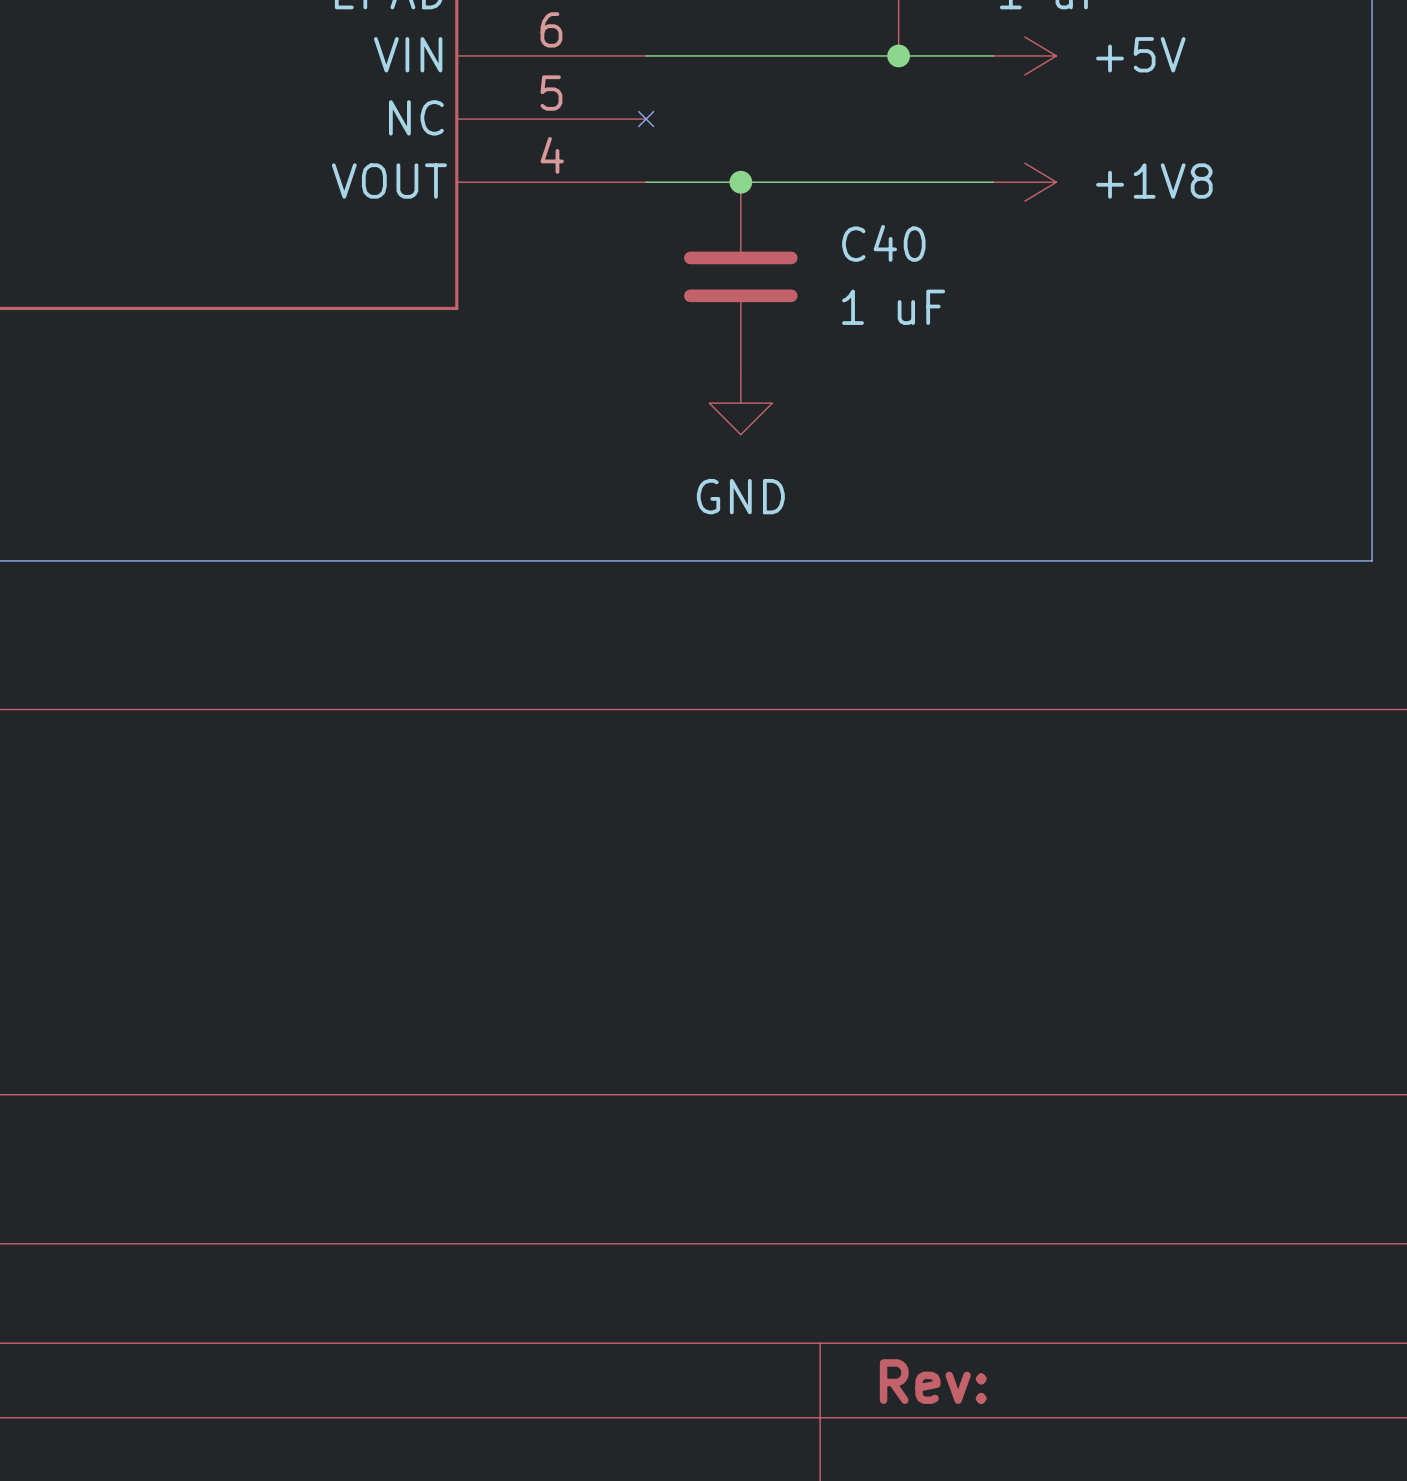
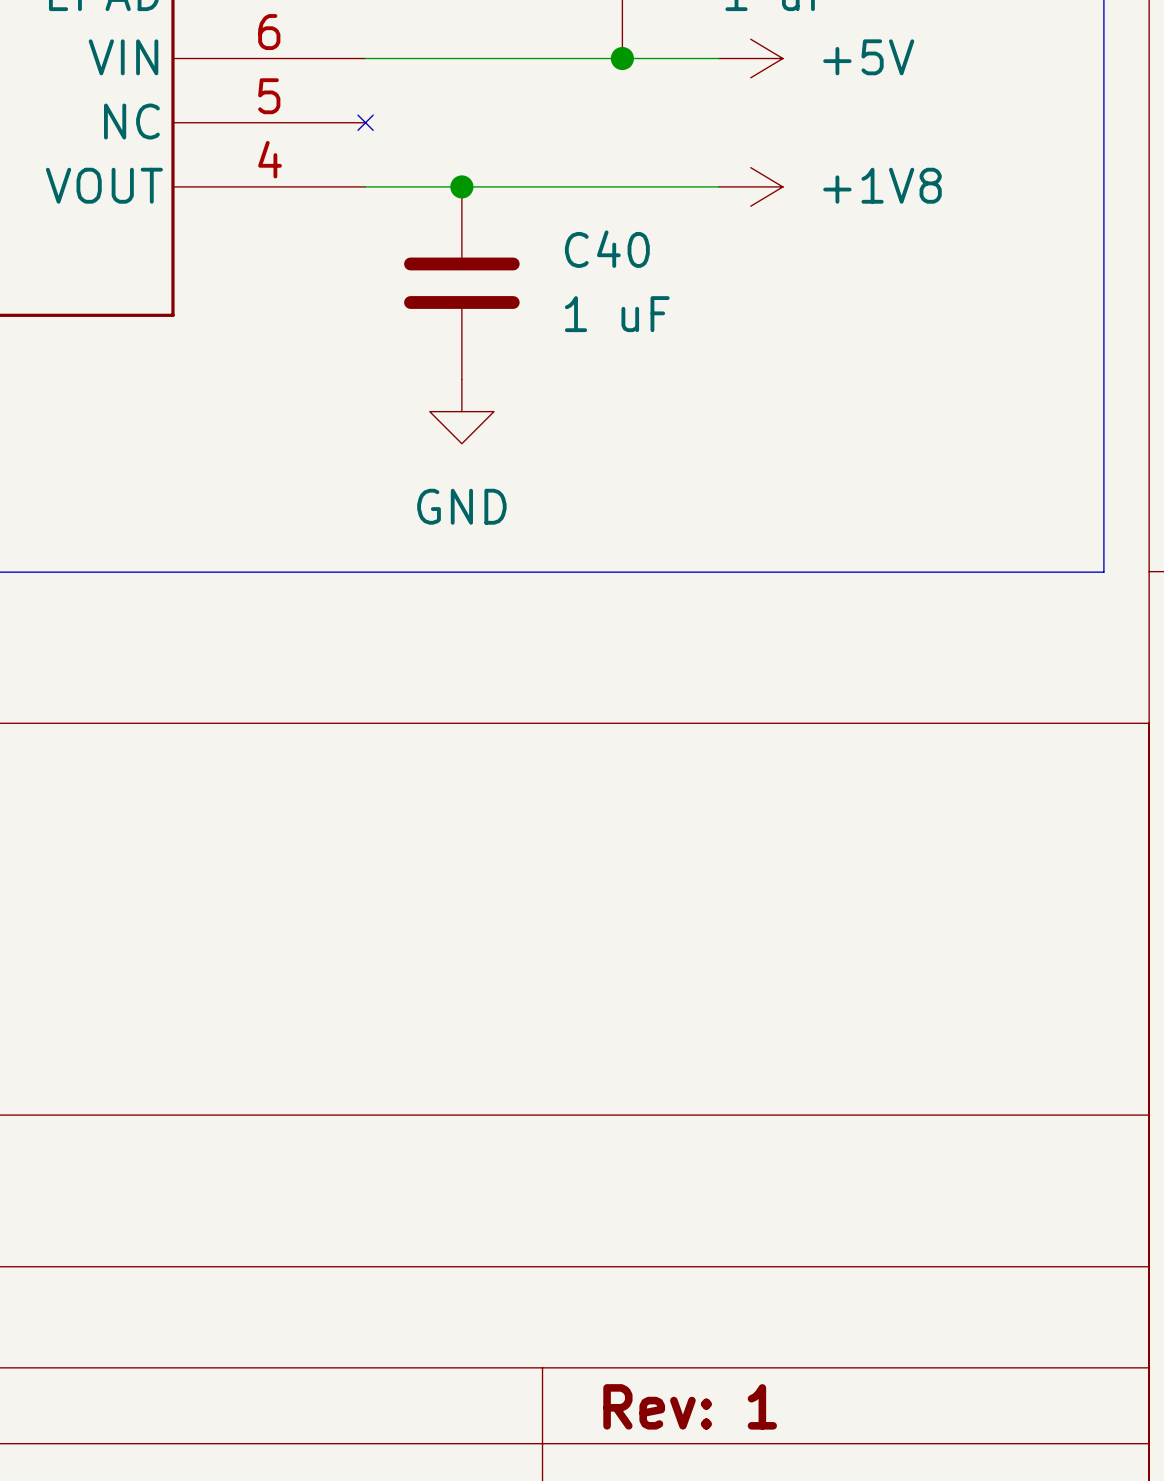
title block: Rev: (933, 1381) -> Rev: 1 (690, 1406)

